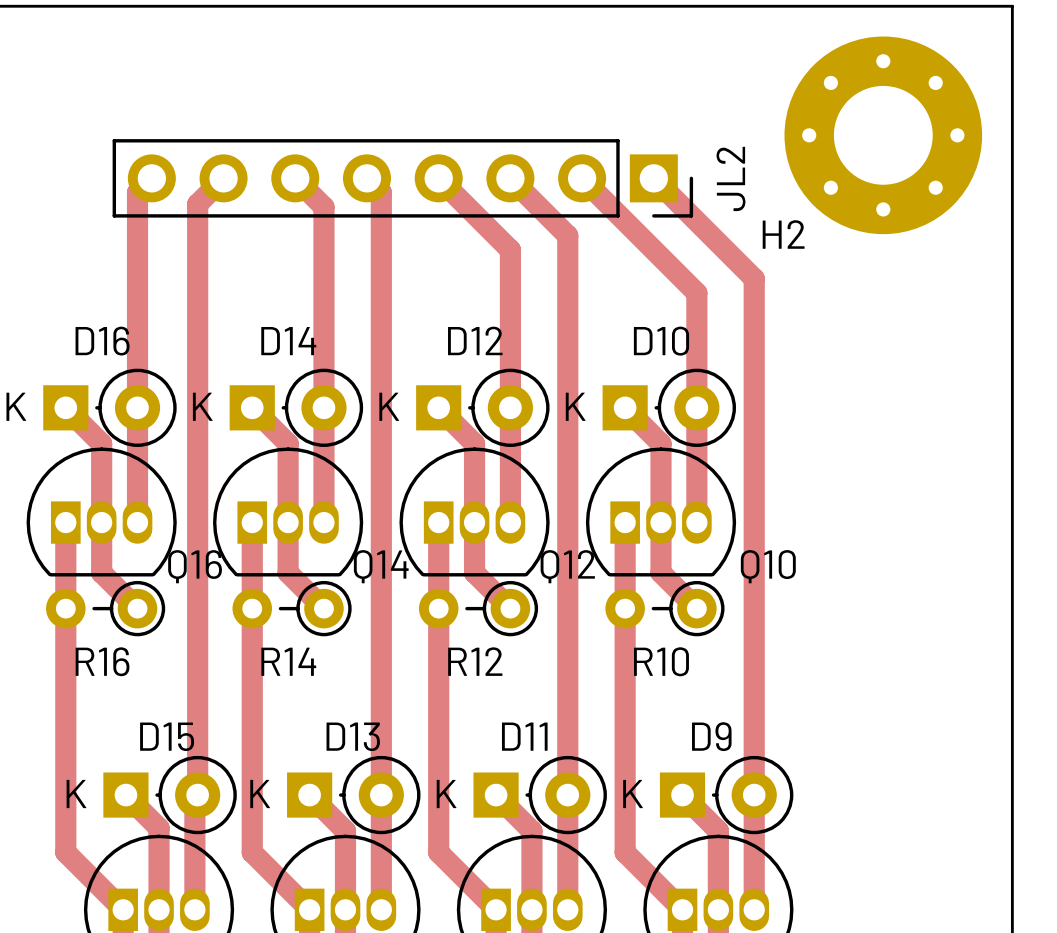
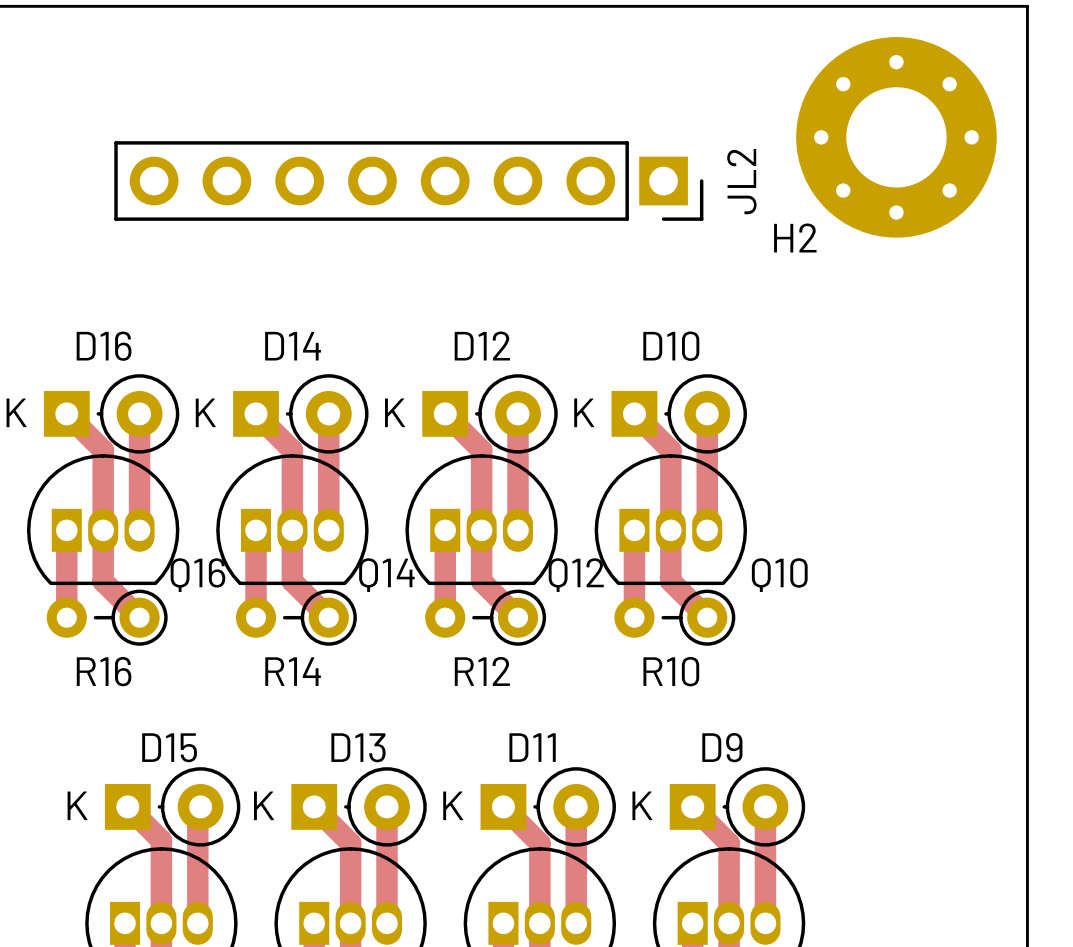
track: (151, 178) (137, 192) (137, 407) -> none
track: (223, 178) (197, 204) (197, 795) -> none
track: (295, 178) (323, 207) (323, 407) -> none
track: (366, 178) (381, 192) (381, 795) -> none
track: (438, 178) (510, 250) (510, 407) -> none
track: (510, 178) (567, 235) (567, 795) -> none
track: (582, 178) (696, 293) (696, 407) -> none
track: (653, 178) (754, 278) (754, 795) -> none
track: (65, 608) (65, 852) (123, 909) -> none
track: (252, 608) (252, 852) (309, 909) -> none
track: (438, 608) (438, 852) (496, 909) -> none
track: (625, 608) (625, 852) (682, 909) -> none

